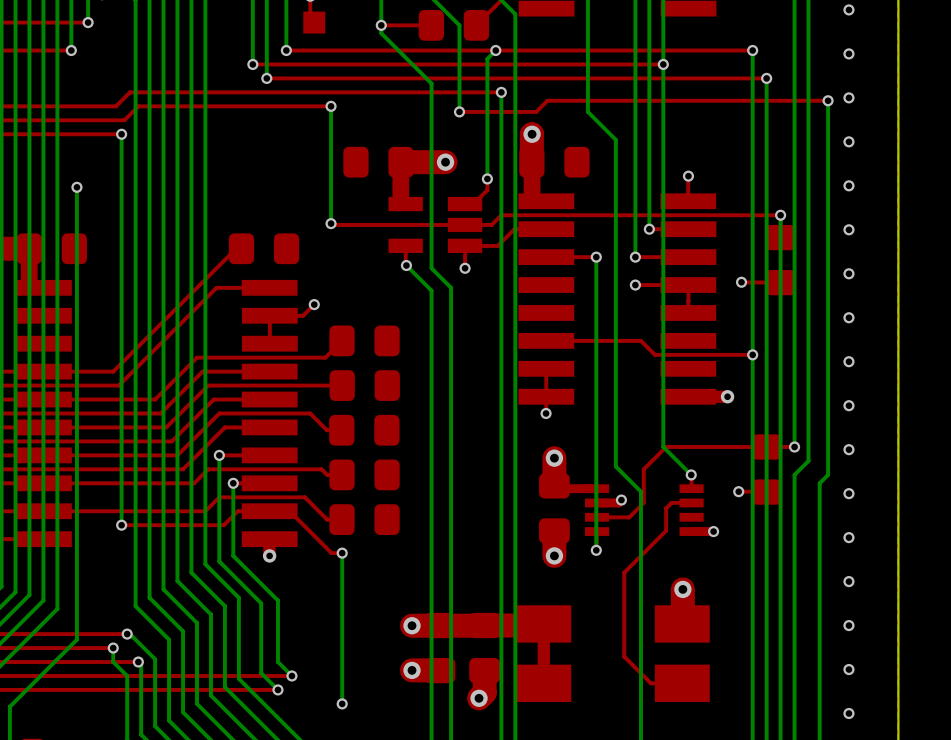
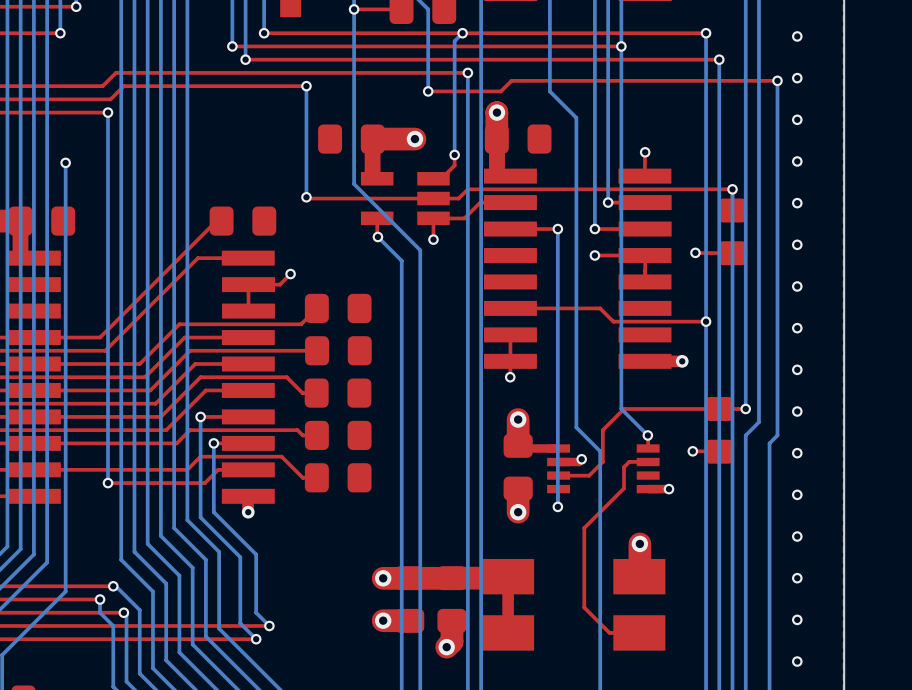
bottom track: (381, 33) (431, 83) (431, 268) (451, 287) -> (354, 16) (354, 184) (420, 250) (420, 258)
top track: (269, 511) (289, 511) (331, 553) (342, 553) -> none
bottom track: (342, 553) (342, 703) -> none
via: (342, 553) -> none
via: (342, 703) -> none

